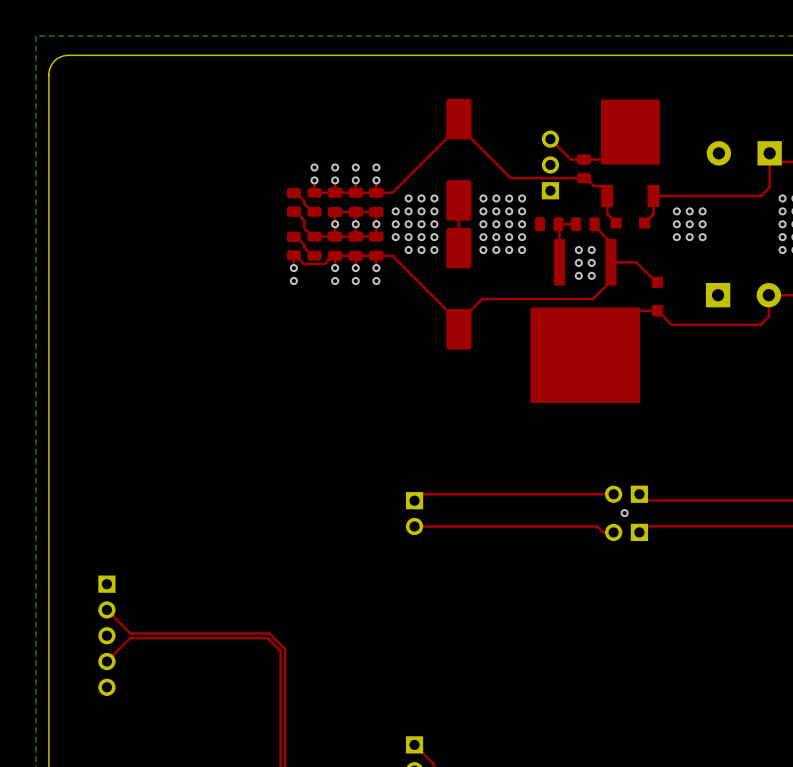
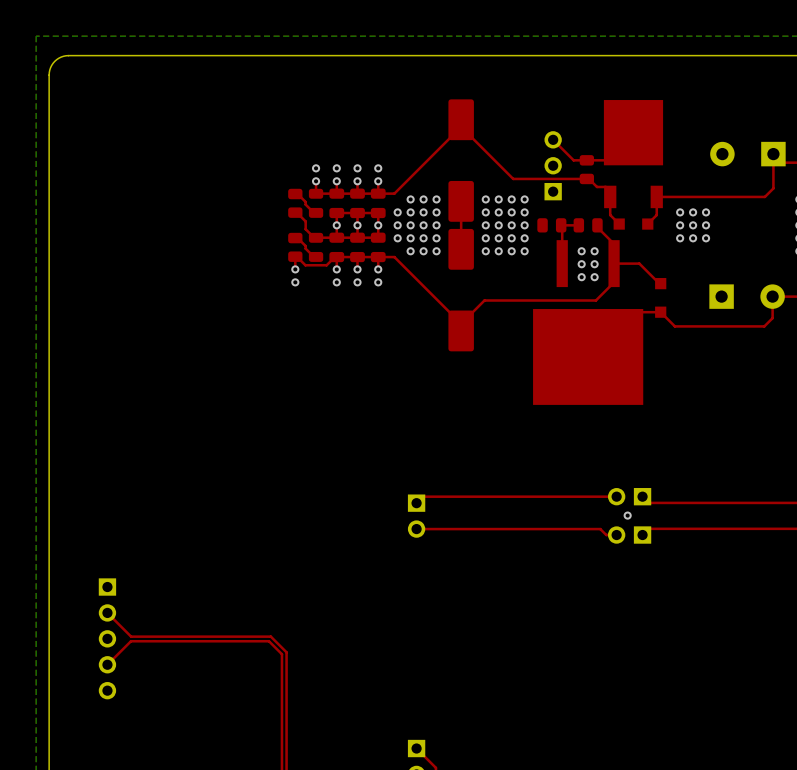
via: (782, 198) -> none
via: (782, 211) -> none
via: (782, 224) -> none
via: (782, 237) -> none
via: (782, 250) -> none

